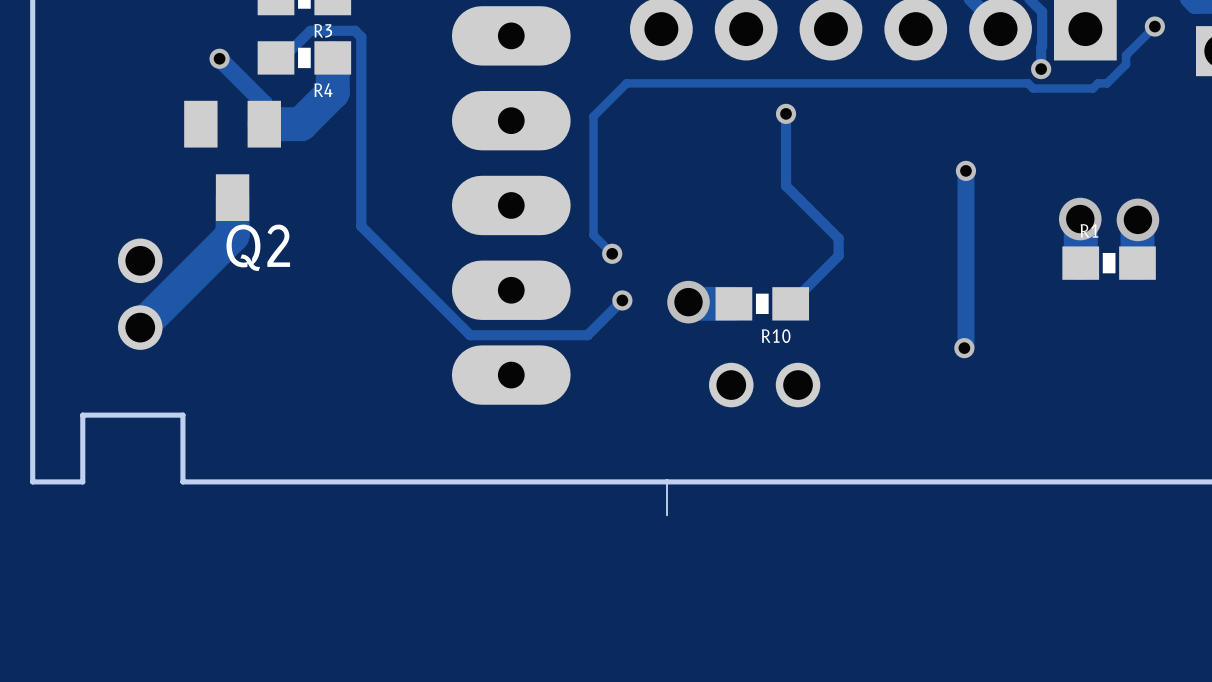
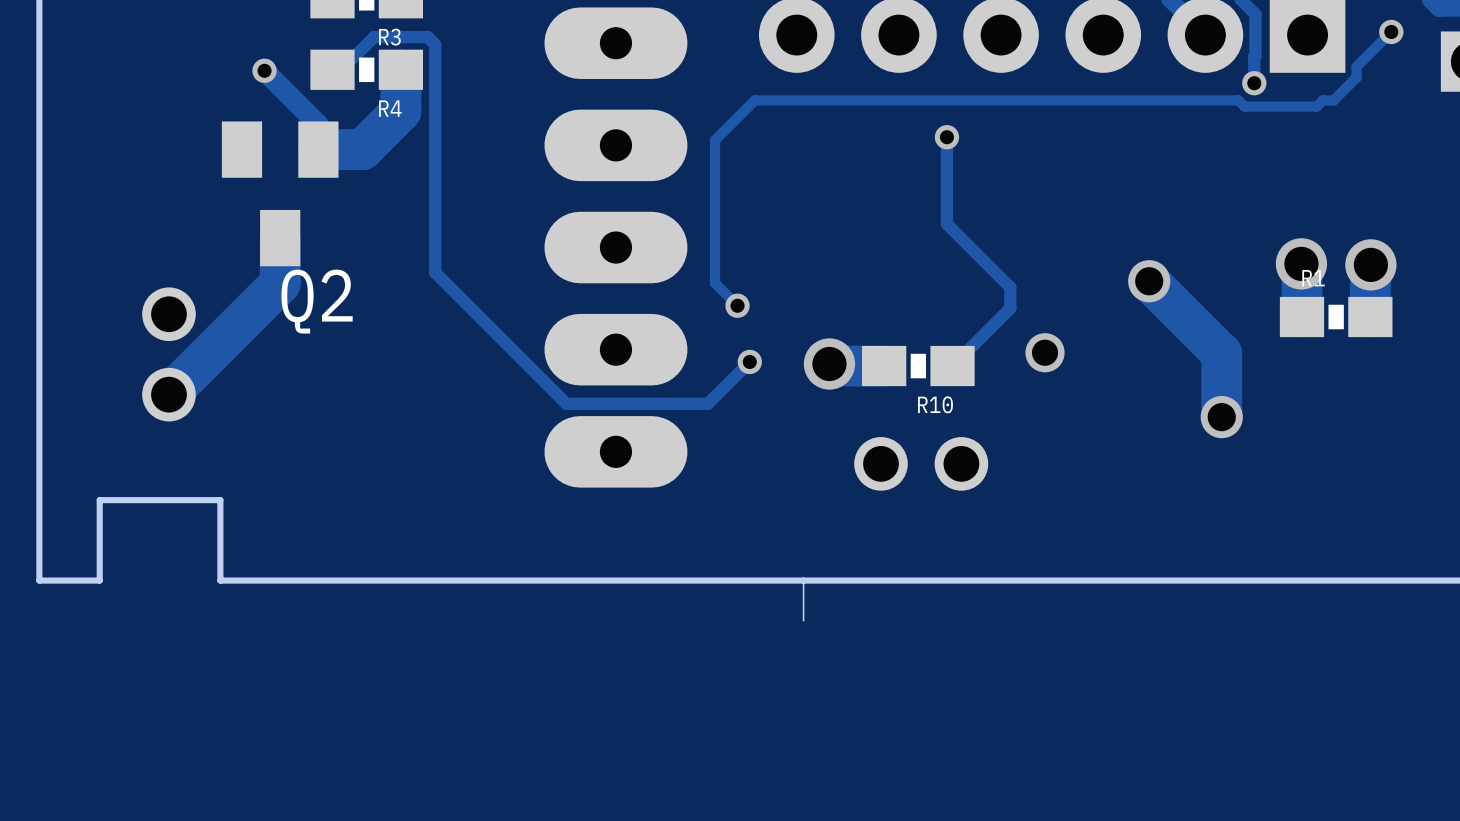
track: (965, 170) (965, 346) (964, 348) -> none
via: (965, 170) -> none
track: none -> (1149, 281) (1221, 353) (1221, 417)
via: none -> (1149, 281)
via: none -> (1045, 352)
via: none -> (1221, 417)
via: (964, 348) -> none

